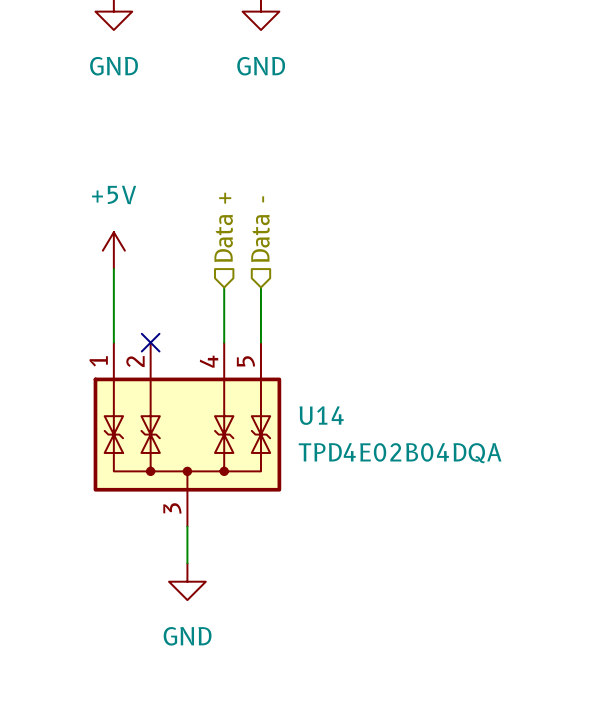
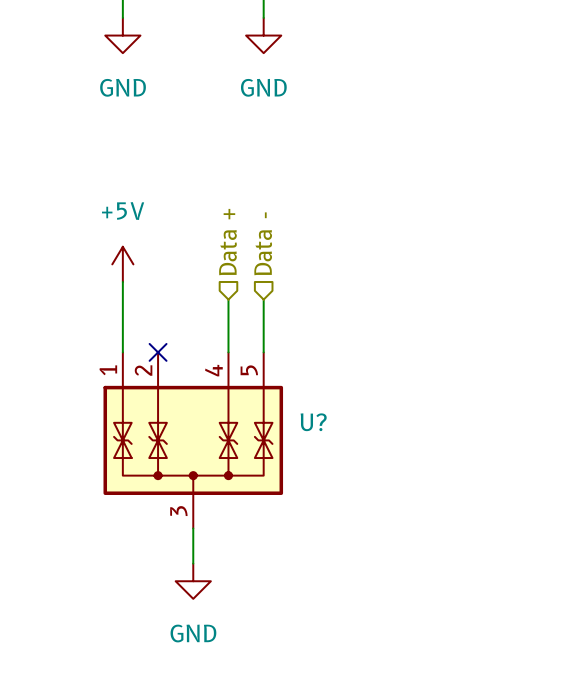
U14 name: U14 (321, 415) -> U? (313, 422)
U14 value: TPD4E02B04DQA (400, 453) -> none

